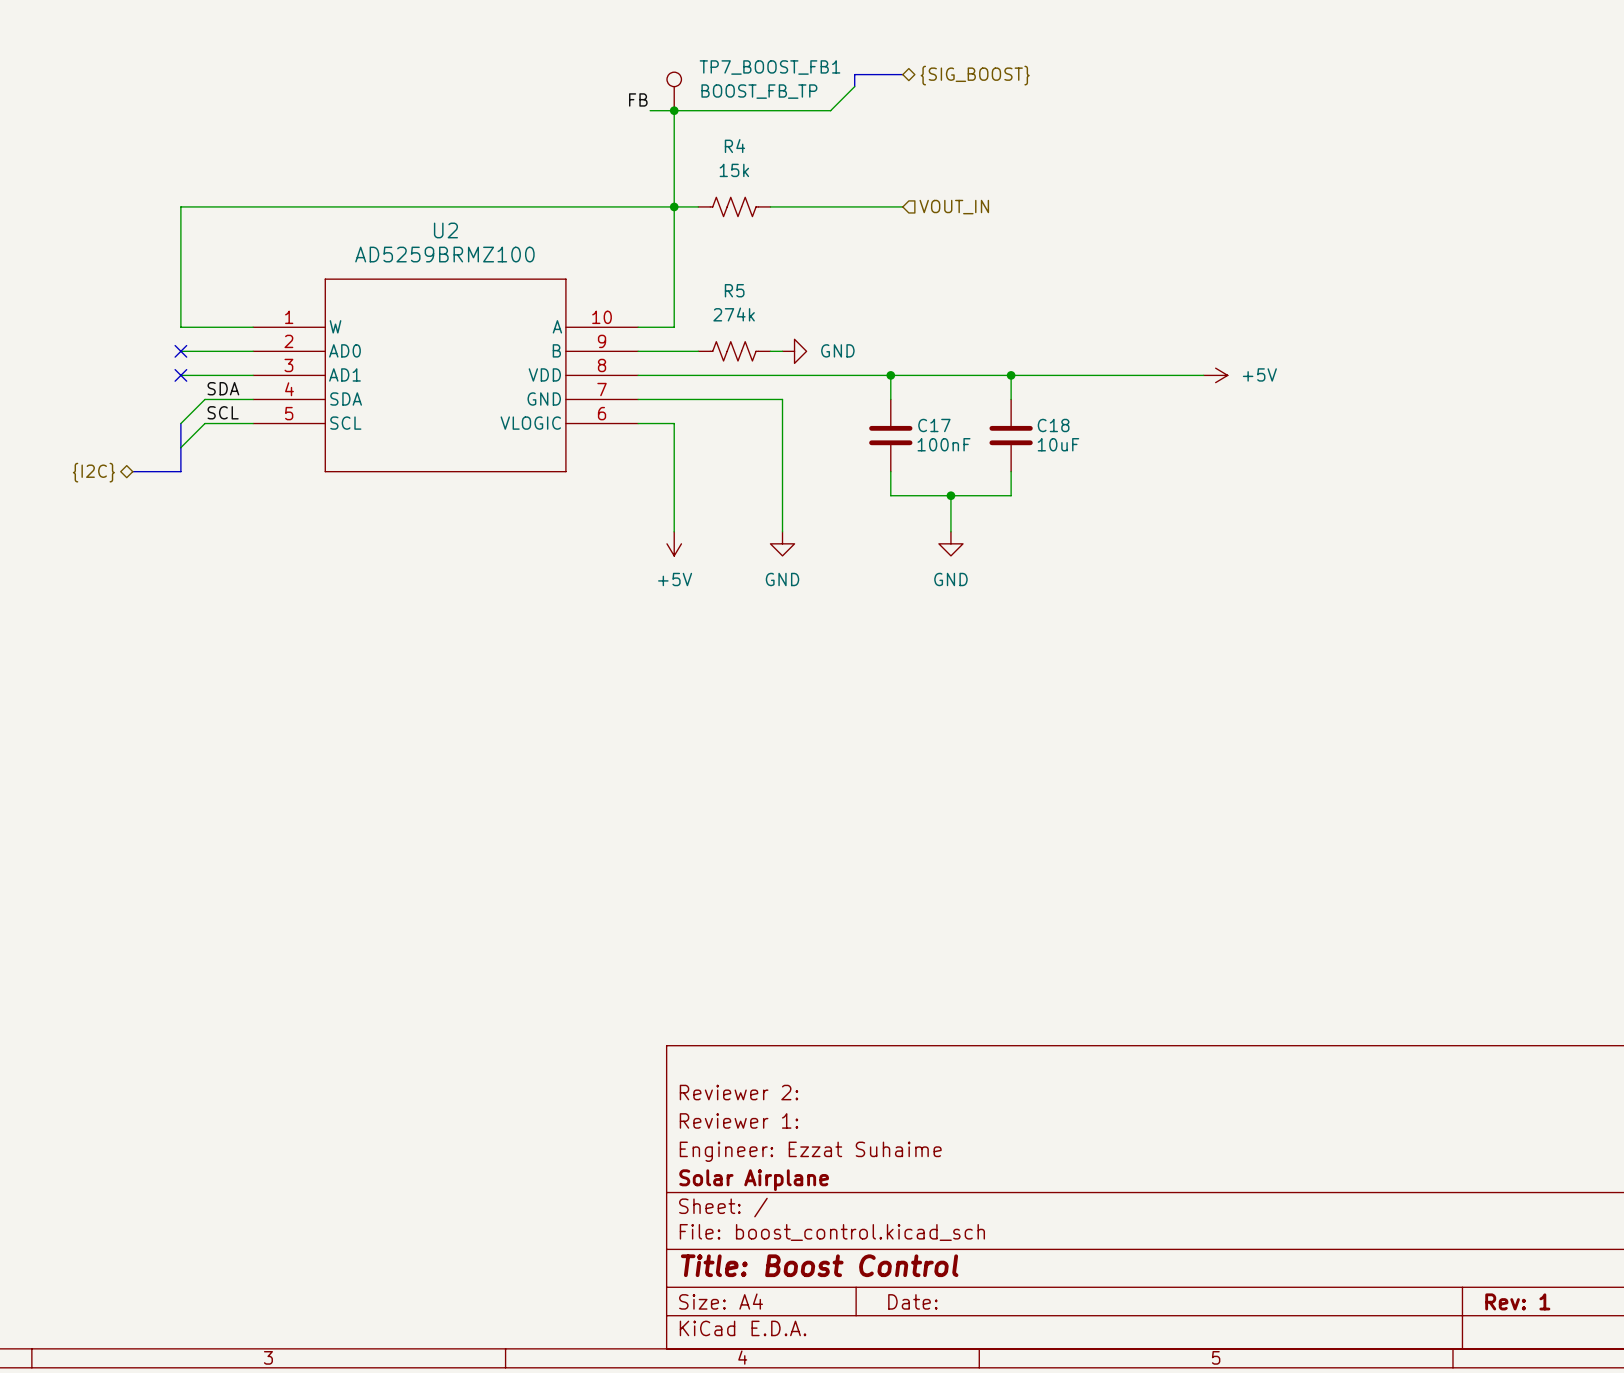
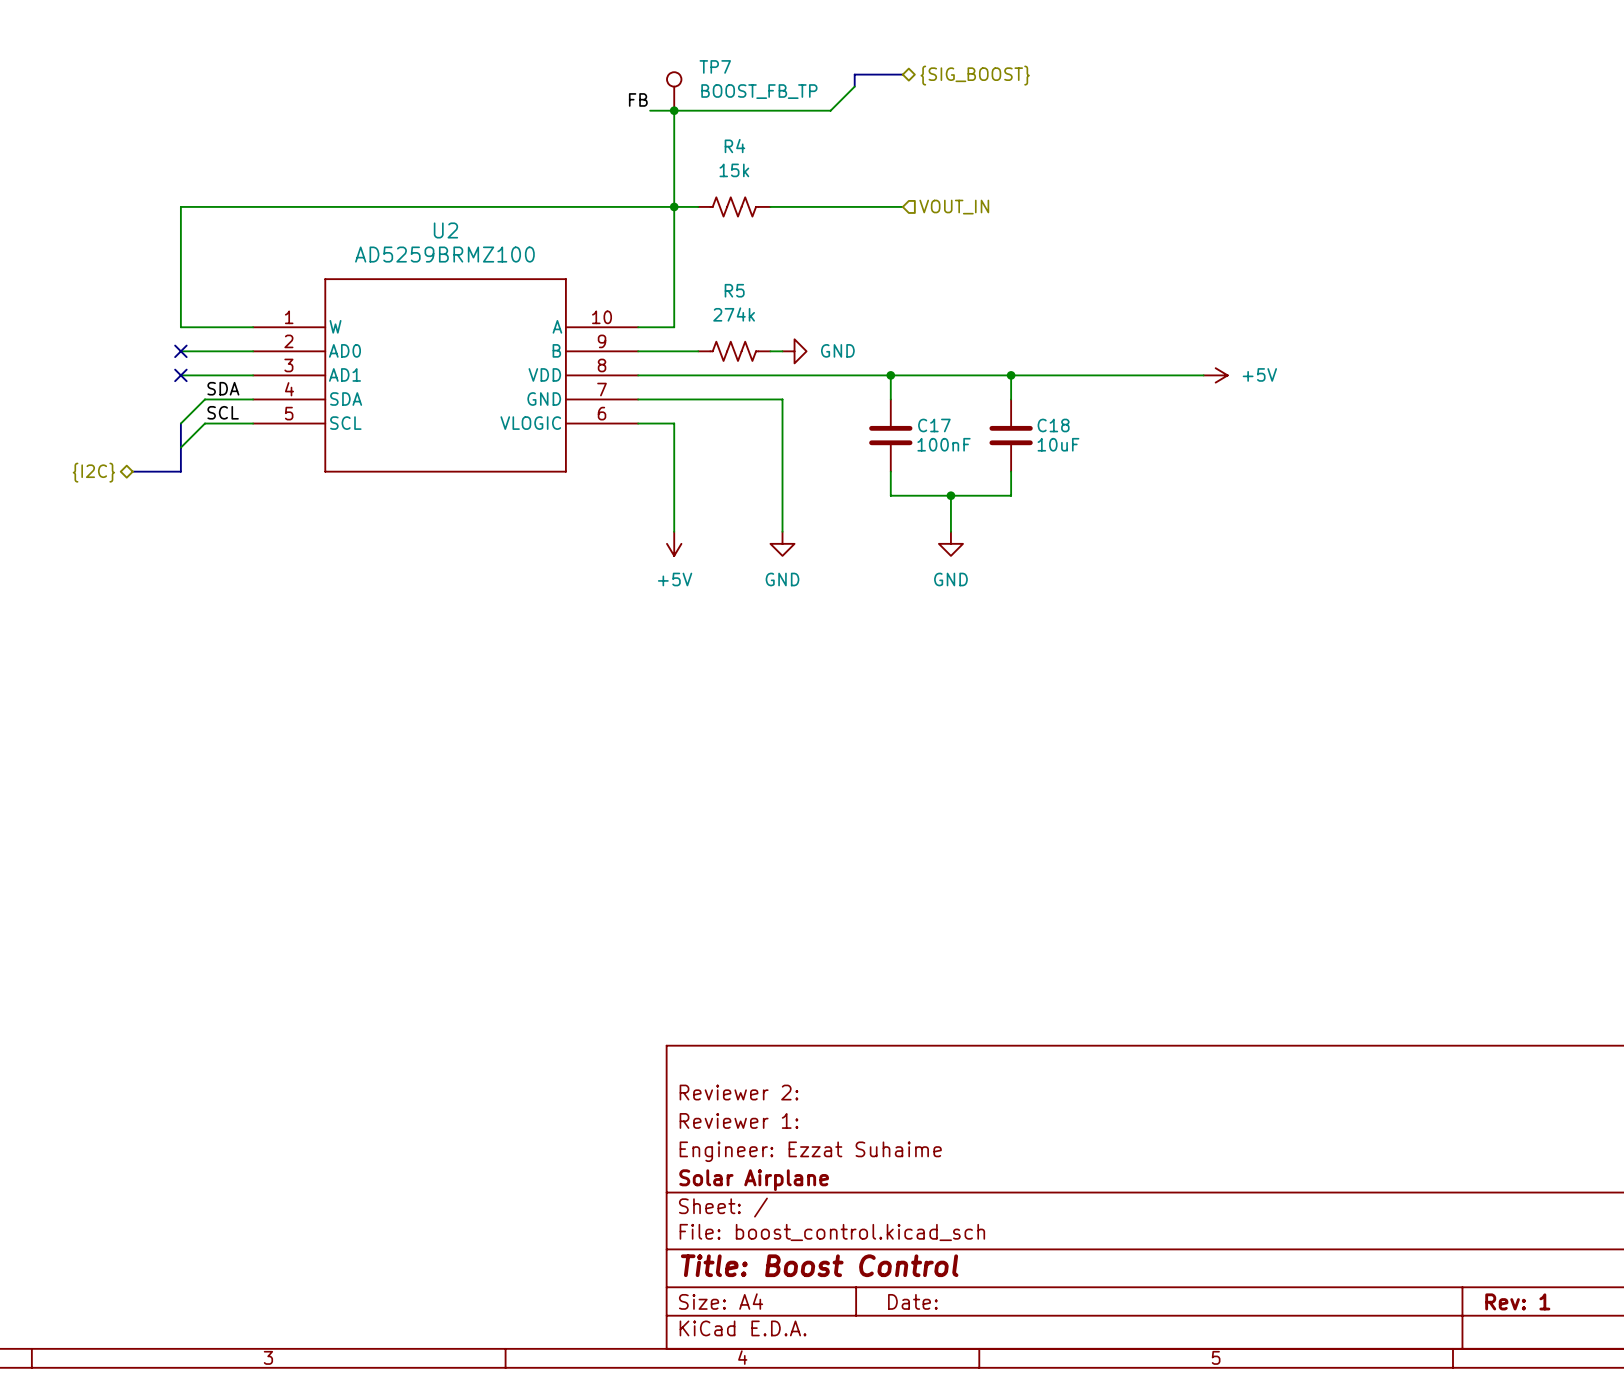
TP7_BOOST_FB1 name: TP7_BOOST_FB1 (769, 67) -> TP7 (715, 66)

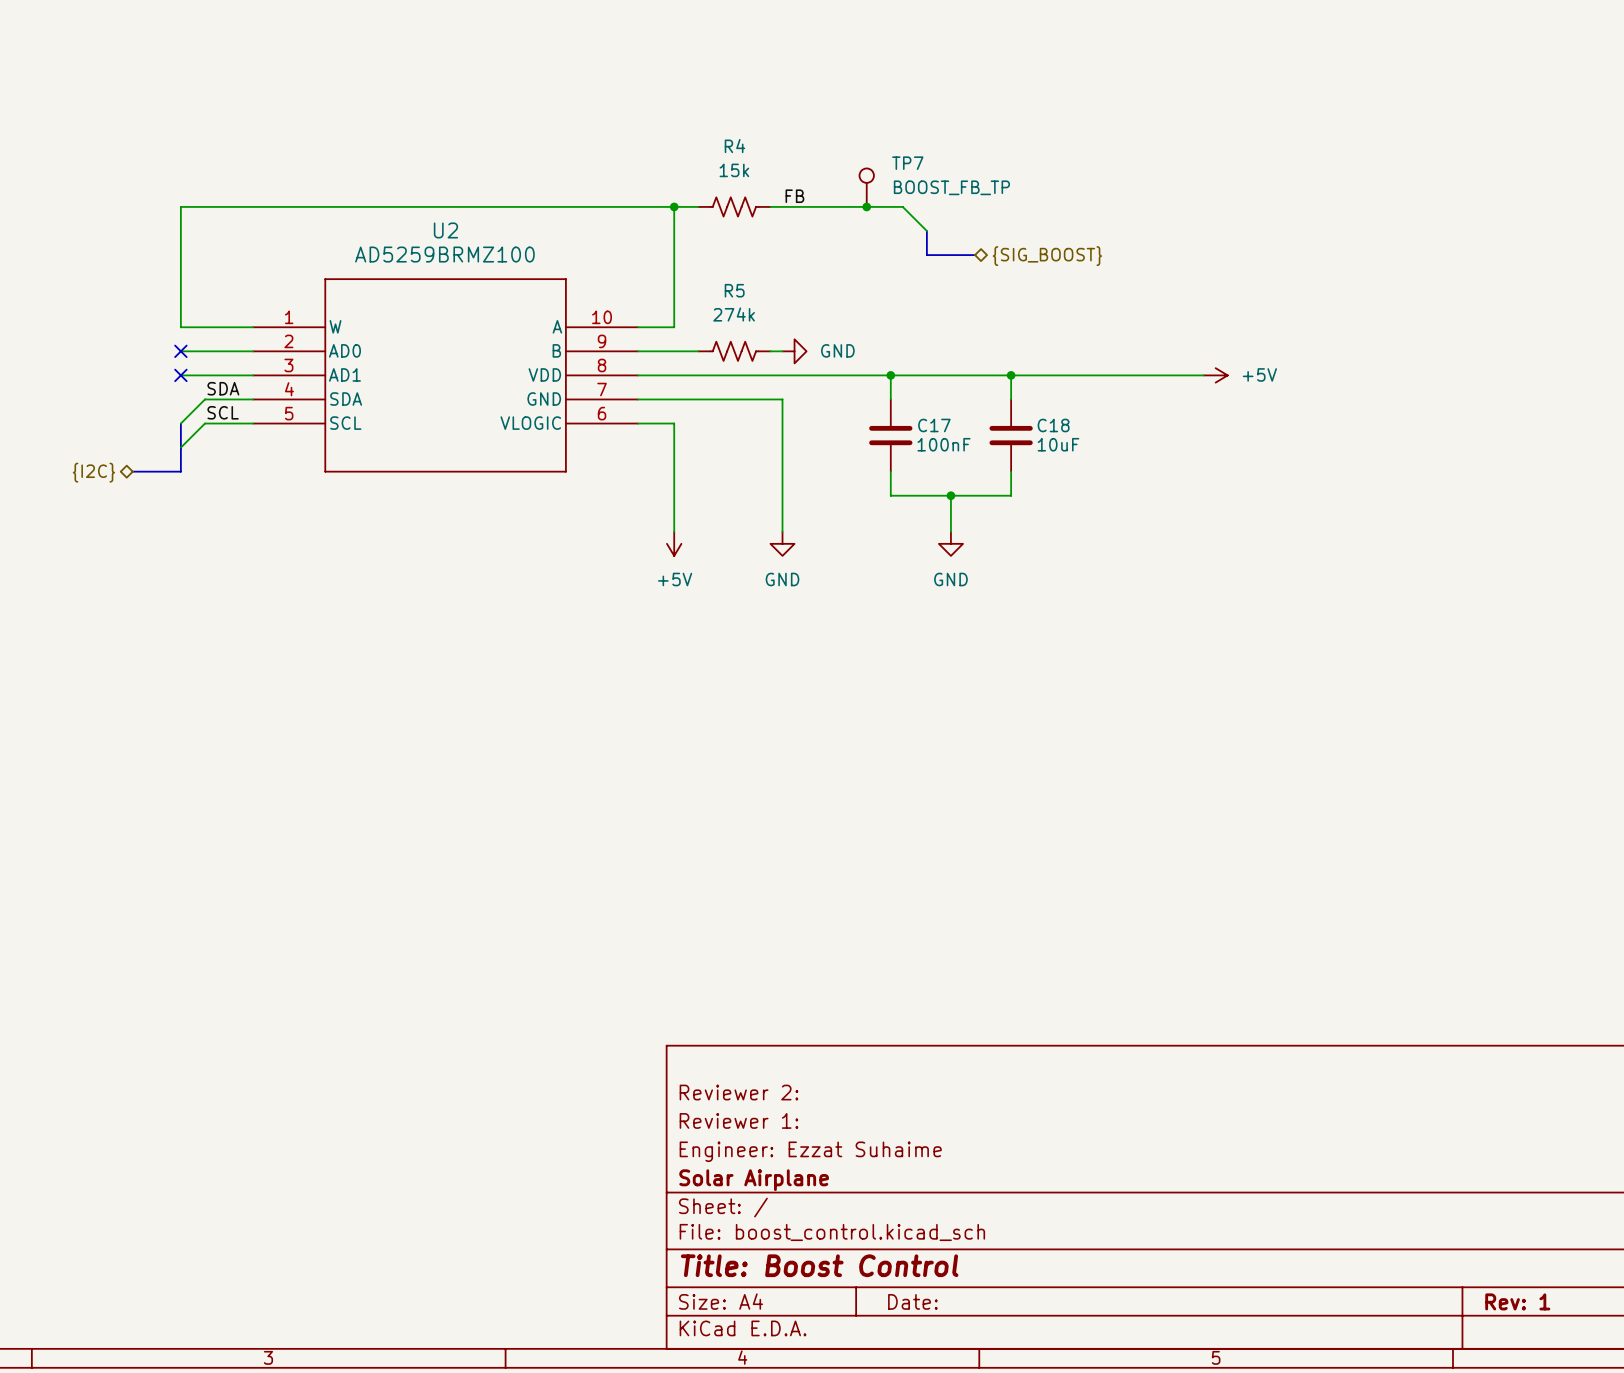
bus: (902, 74) (854, 74) (854, 86) -> none
hierarchical label position: {SIG_BOOST} (975, 75) -> {SIG_BOOST} (1047, 256)
wire: (854, 86) (830, 110) (650, 110) -> none
TP7 position: (674, 91) -> (866, 187)
label position: FB (638, 99) -> FB (794, 196)
wire: (674, 110) (674, 206) -> none
junction: (674, 110) -> none
junction: none -> (866, 206)
wire: none -> (902, 206) (926, 231)
hierarchical label: VOUT_IN (954, 207) -> none
bus: none -> (926, 231) (926, 255) (975, 255)

